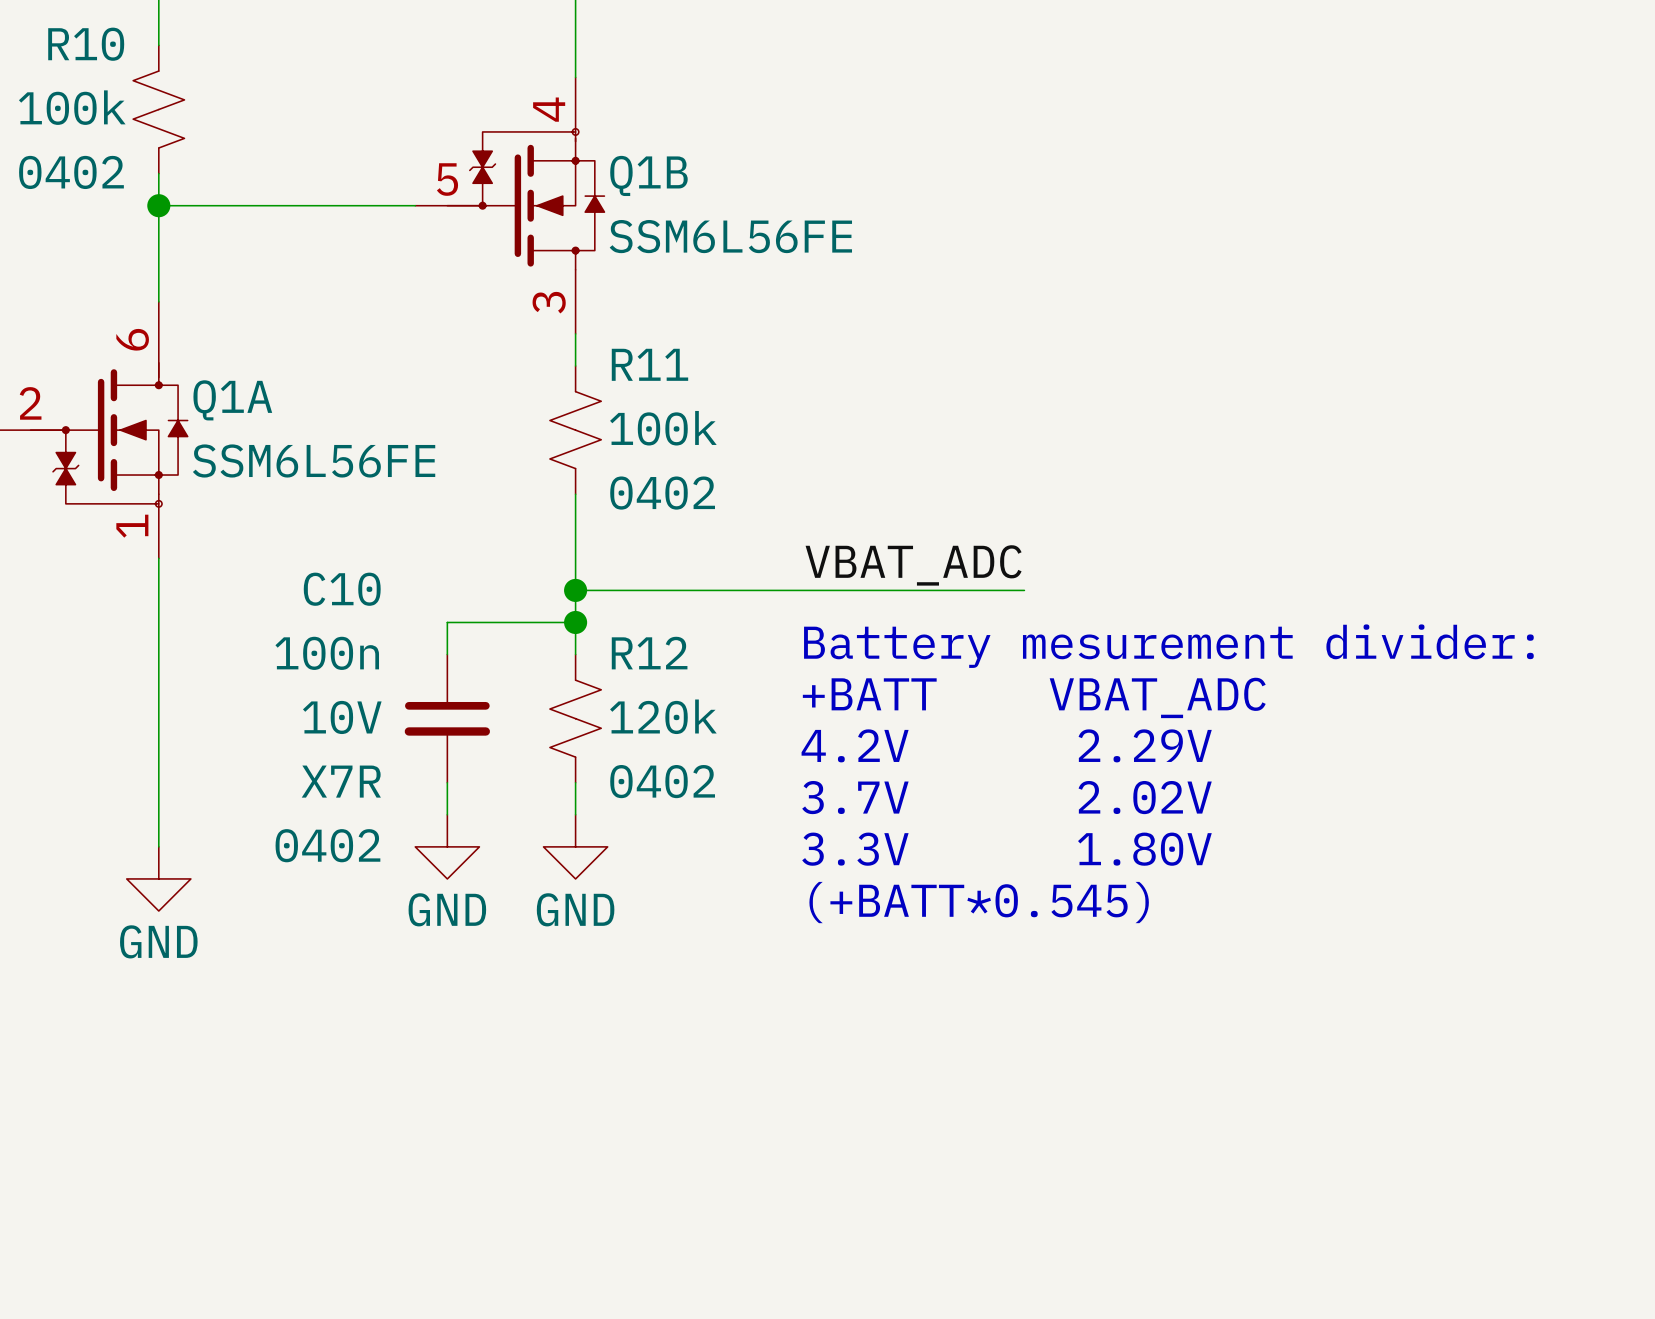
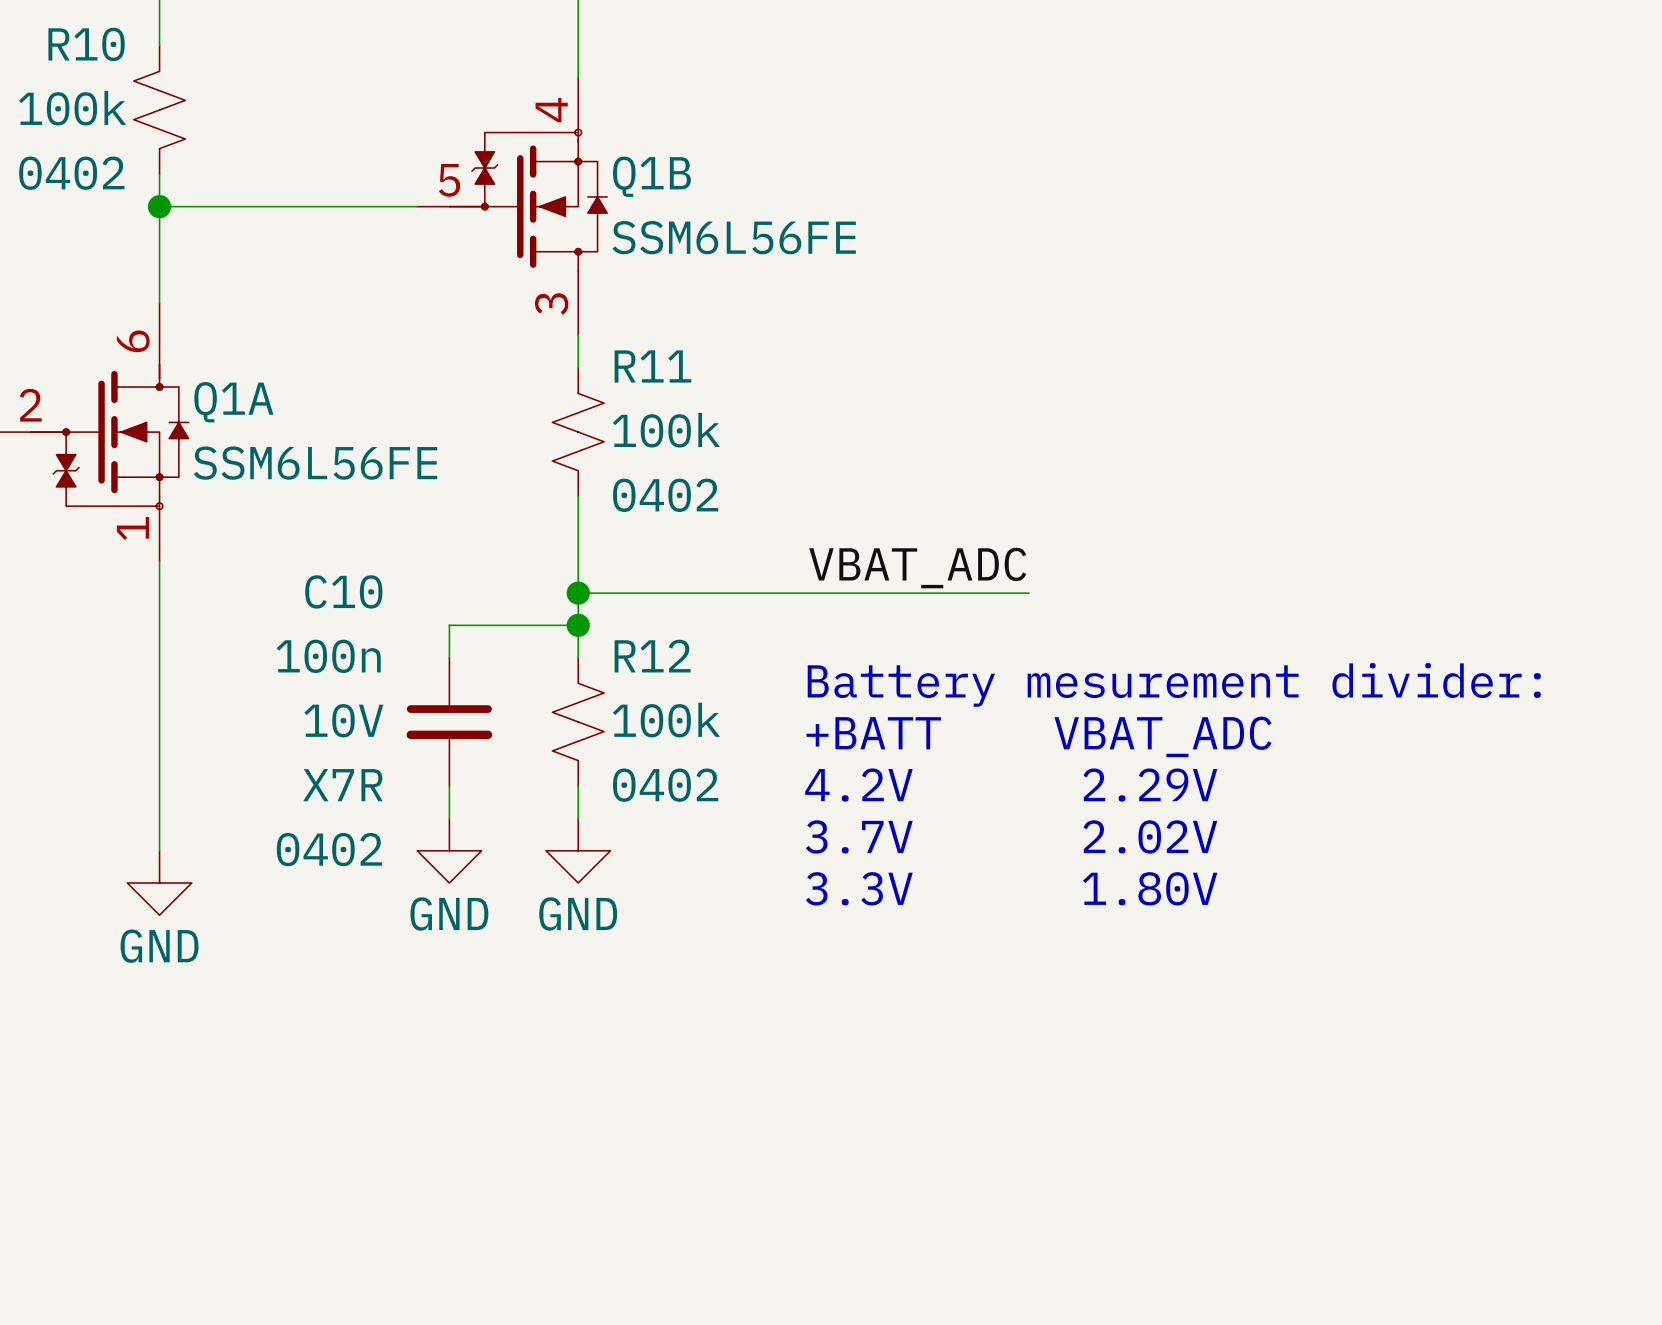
text: Battery mesurement divider: (1168, 646) -> none
text: +BATT VBAT_ADC (1034, 697) -> Battery mesurement divider: (1174, 684)
R12 value: 120k (663, 716) -> 100k (666, 720)
text: 4.2V 2.29V (1006, 745) -> +BATT VBAT_ADC (1039, 736)
text: 3.7V 2.02V (1006, 797) -> 4.2V 2.29V (1011, 785)
text: 3.3V 1.80V (1006, 849) -> 3.7V 2.02V (1011, 836)
text: (+BATT*0.545) (979, 902) -> 3.3V 1.80V (1011, 888)

